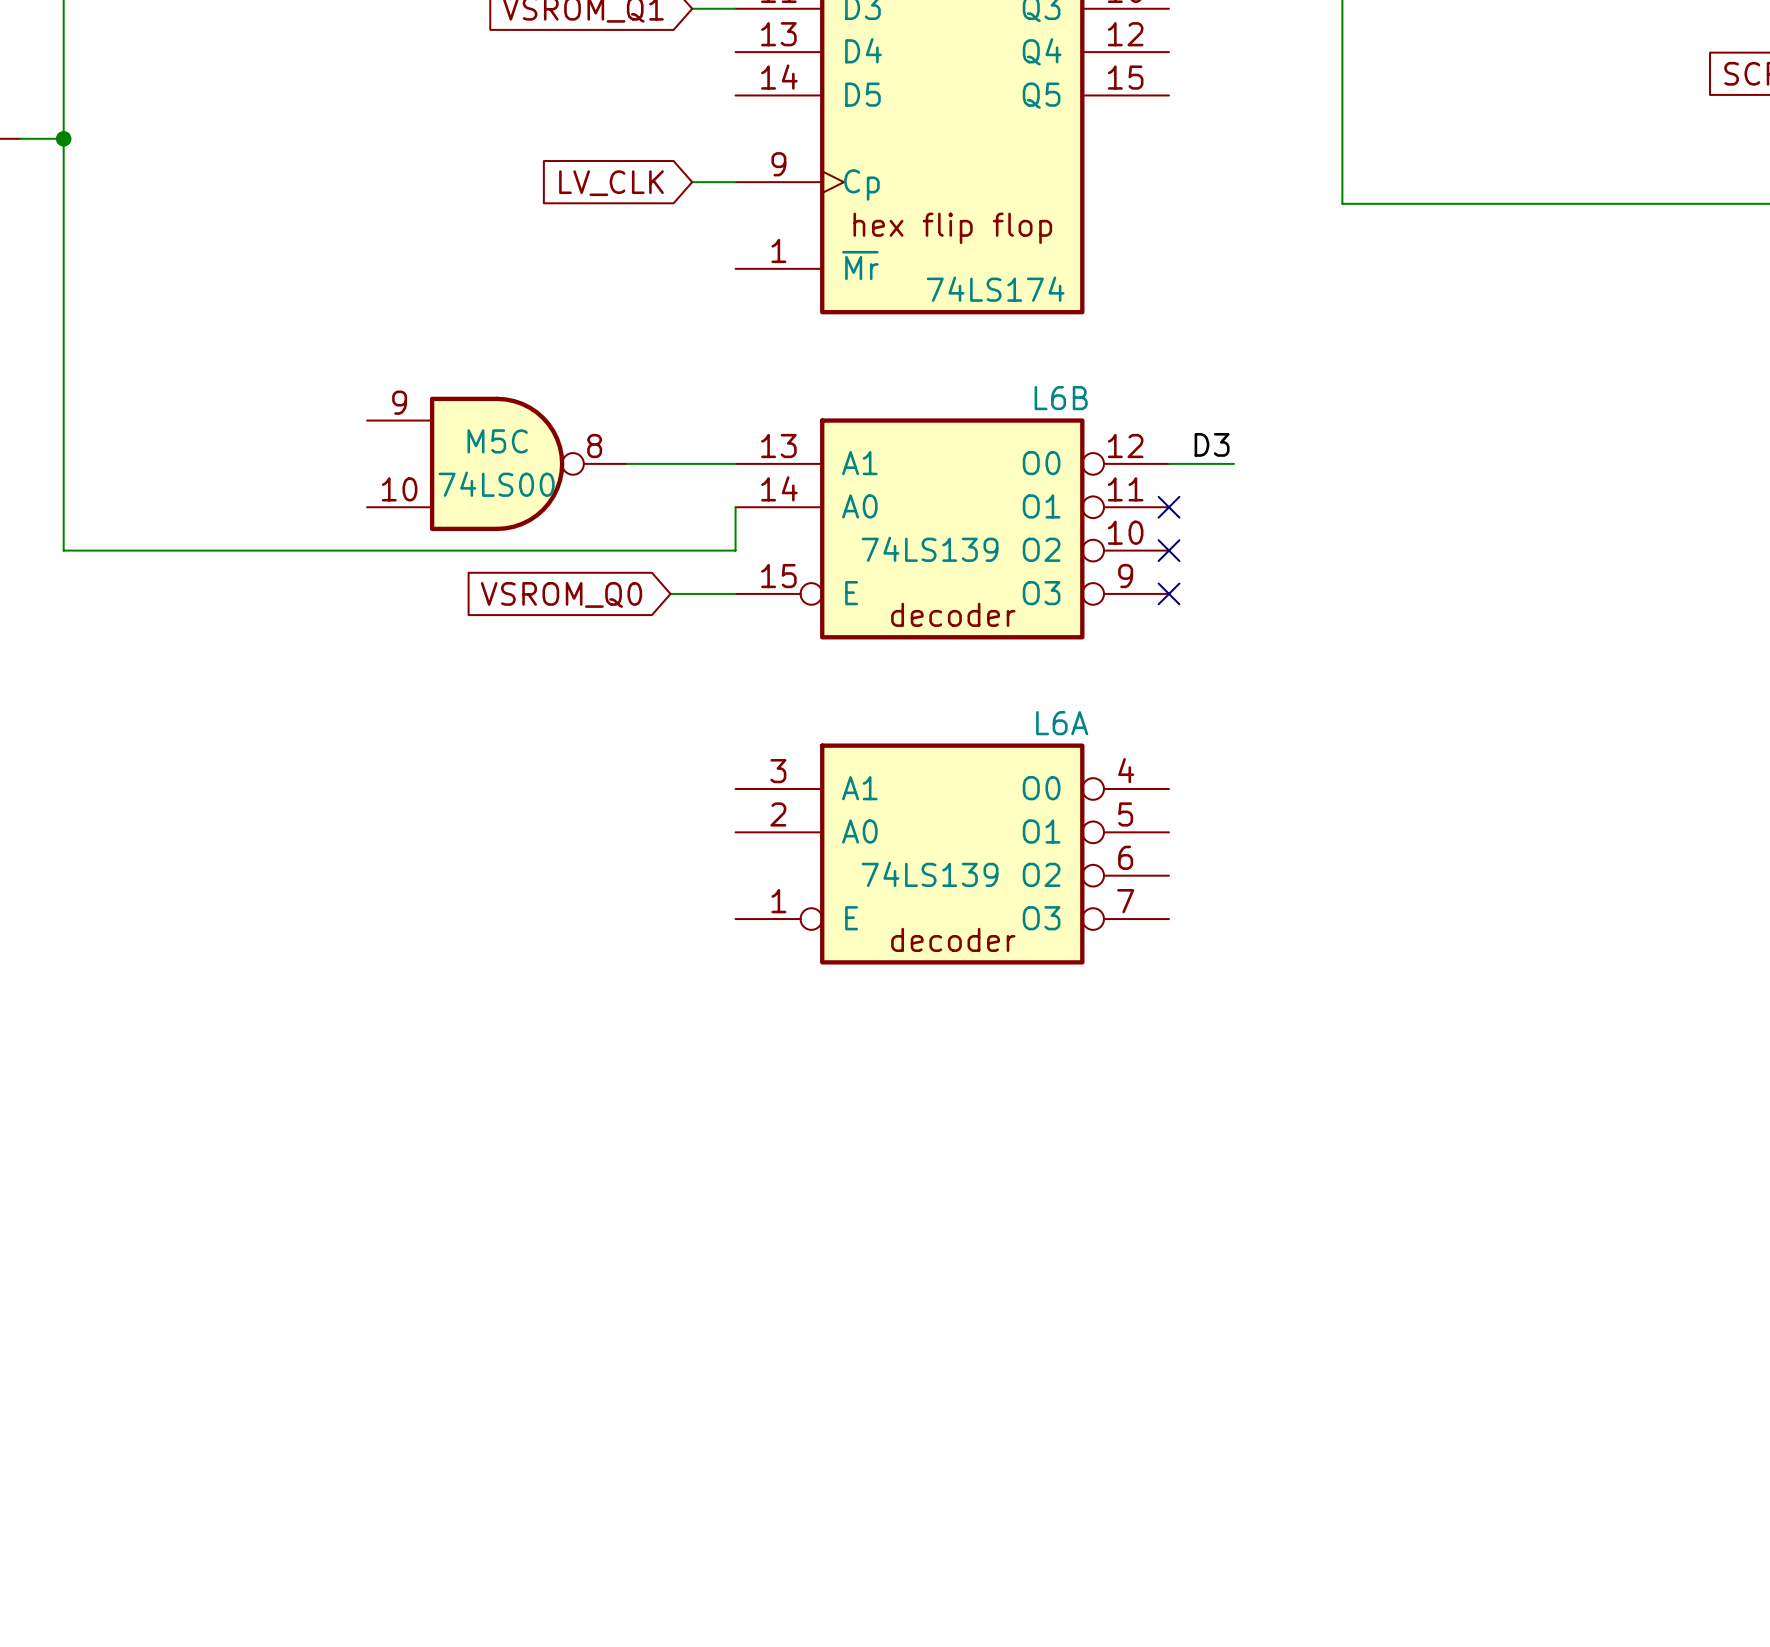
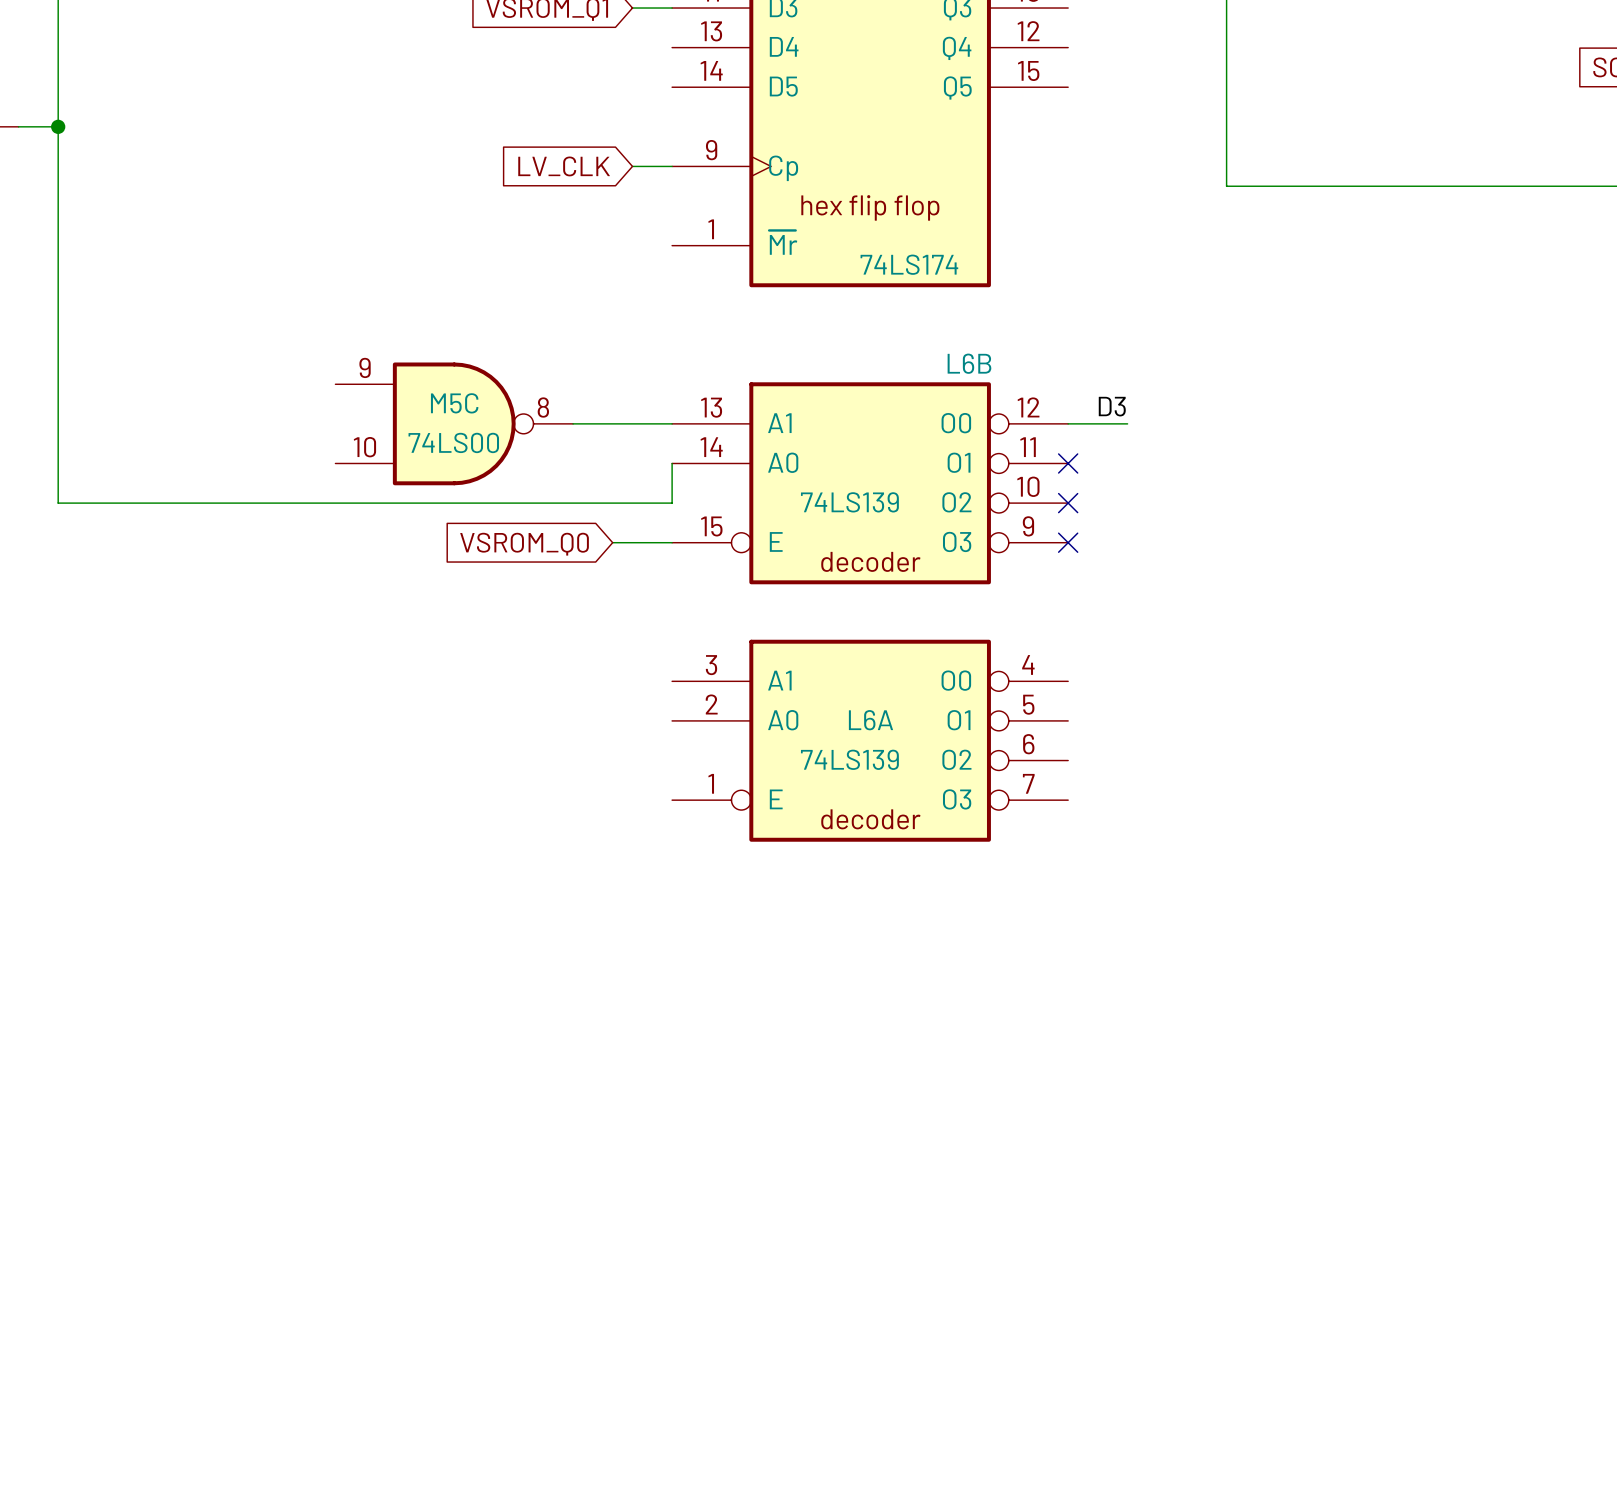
L6A name position: L6A (1062, 723) -> L6A (870, 720)
L6A position: (952, 854) -> (870, 740)

